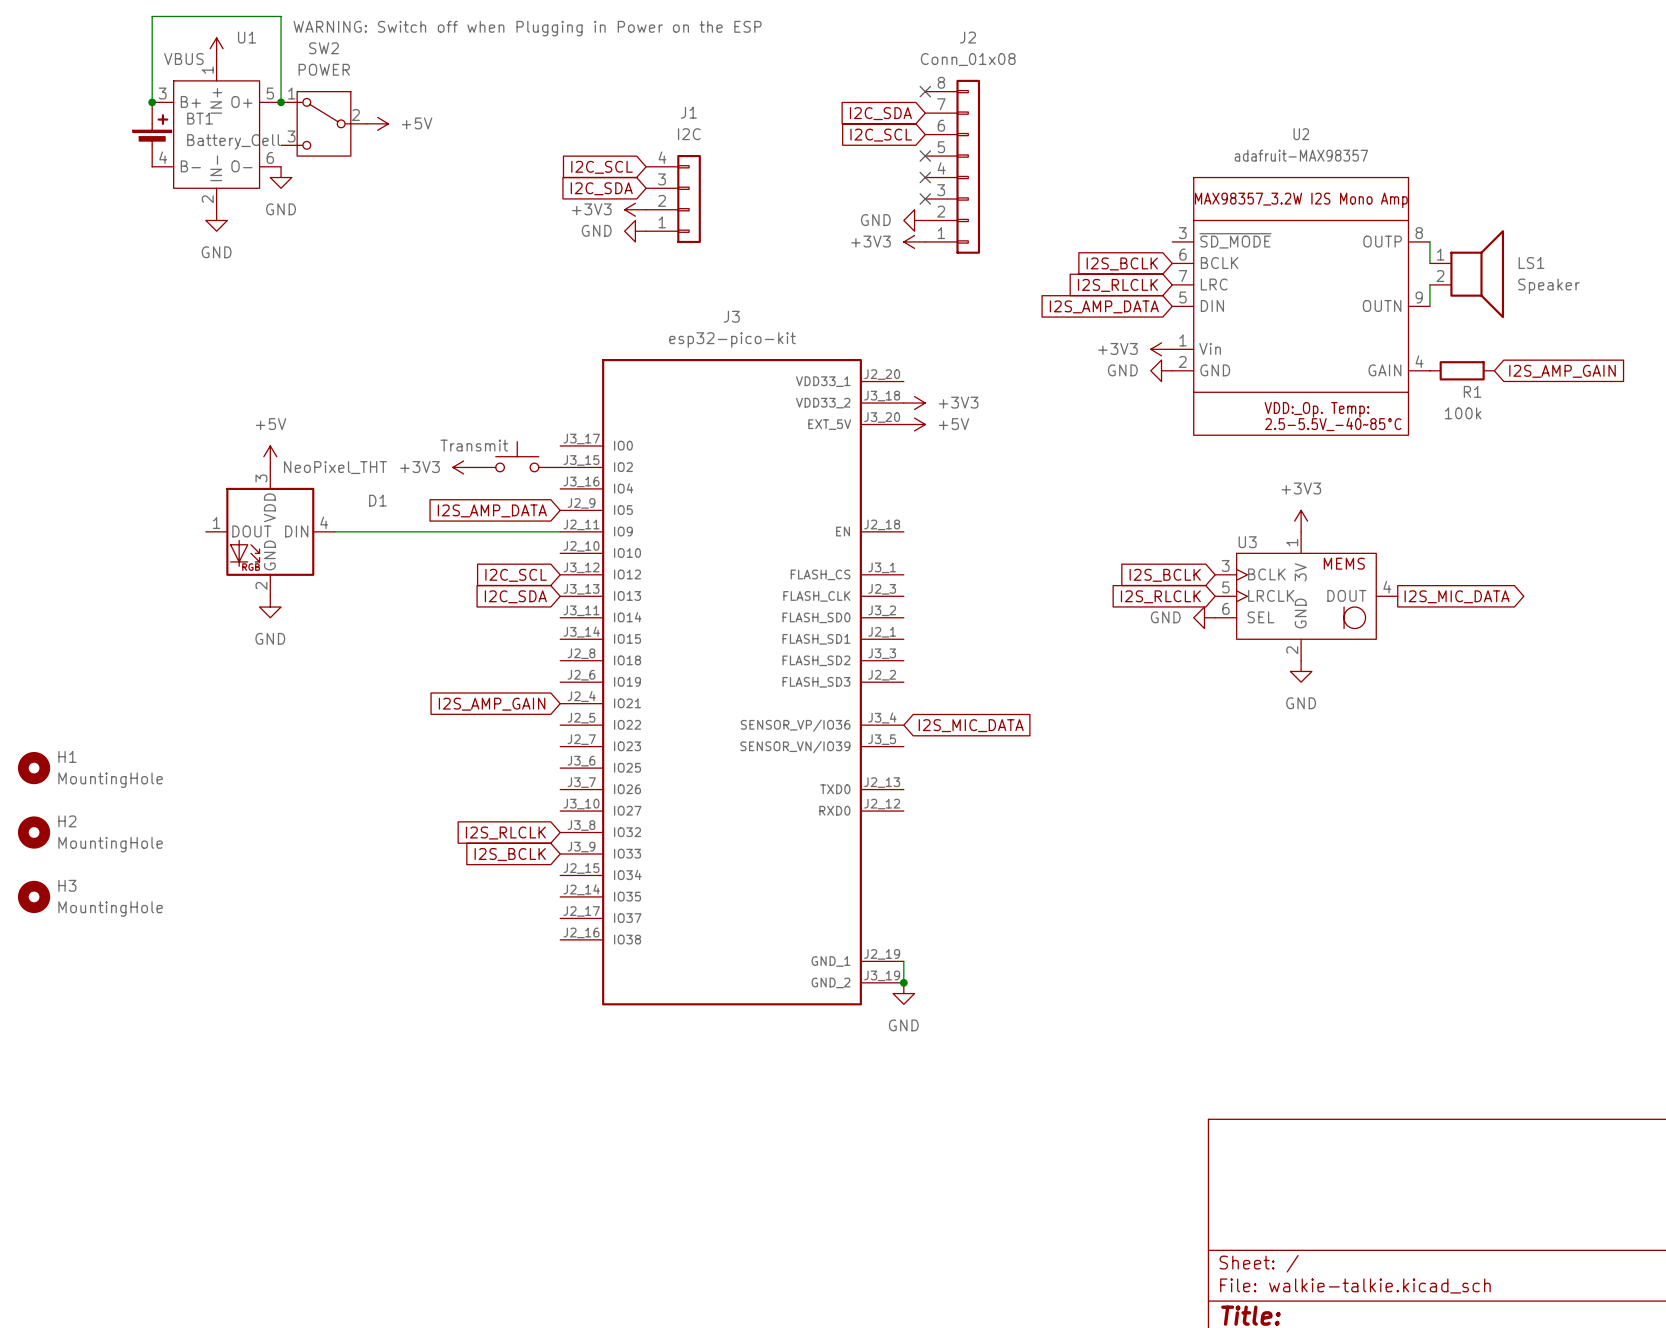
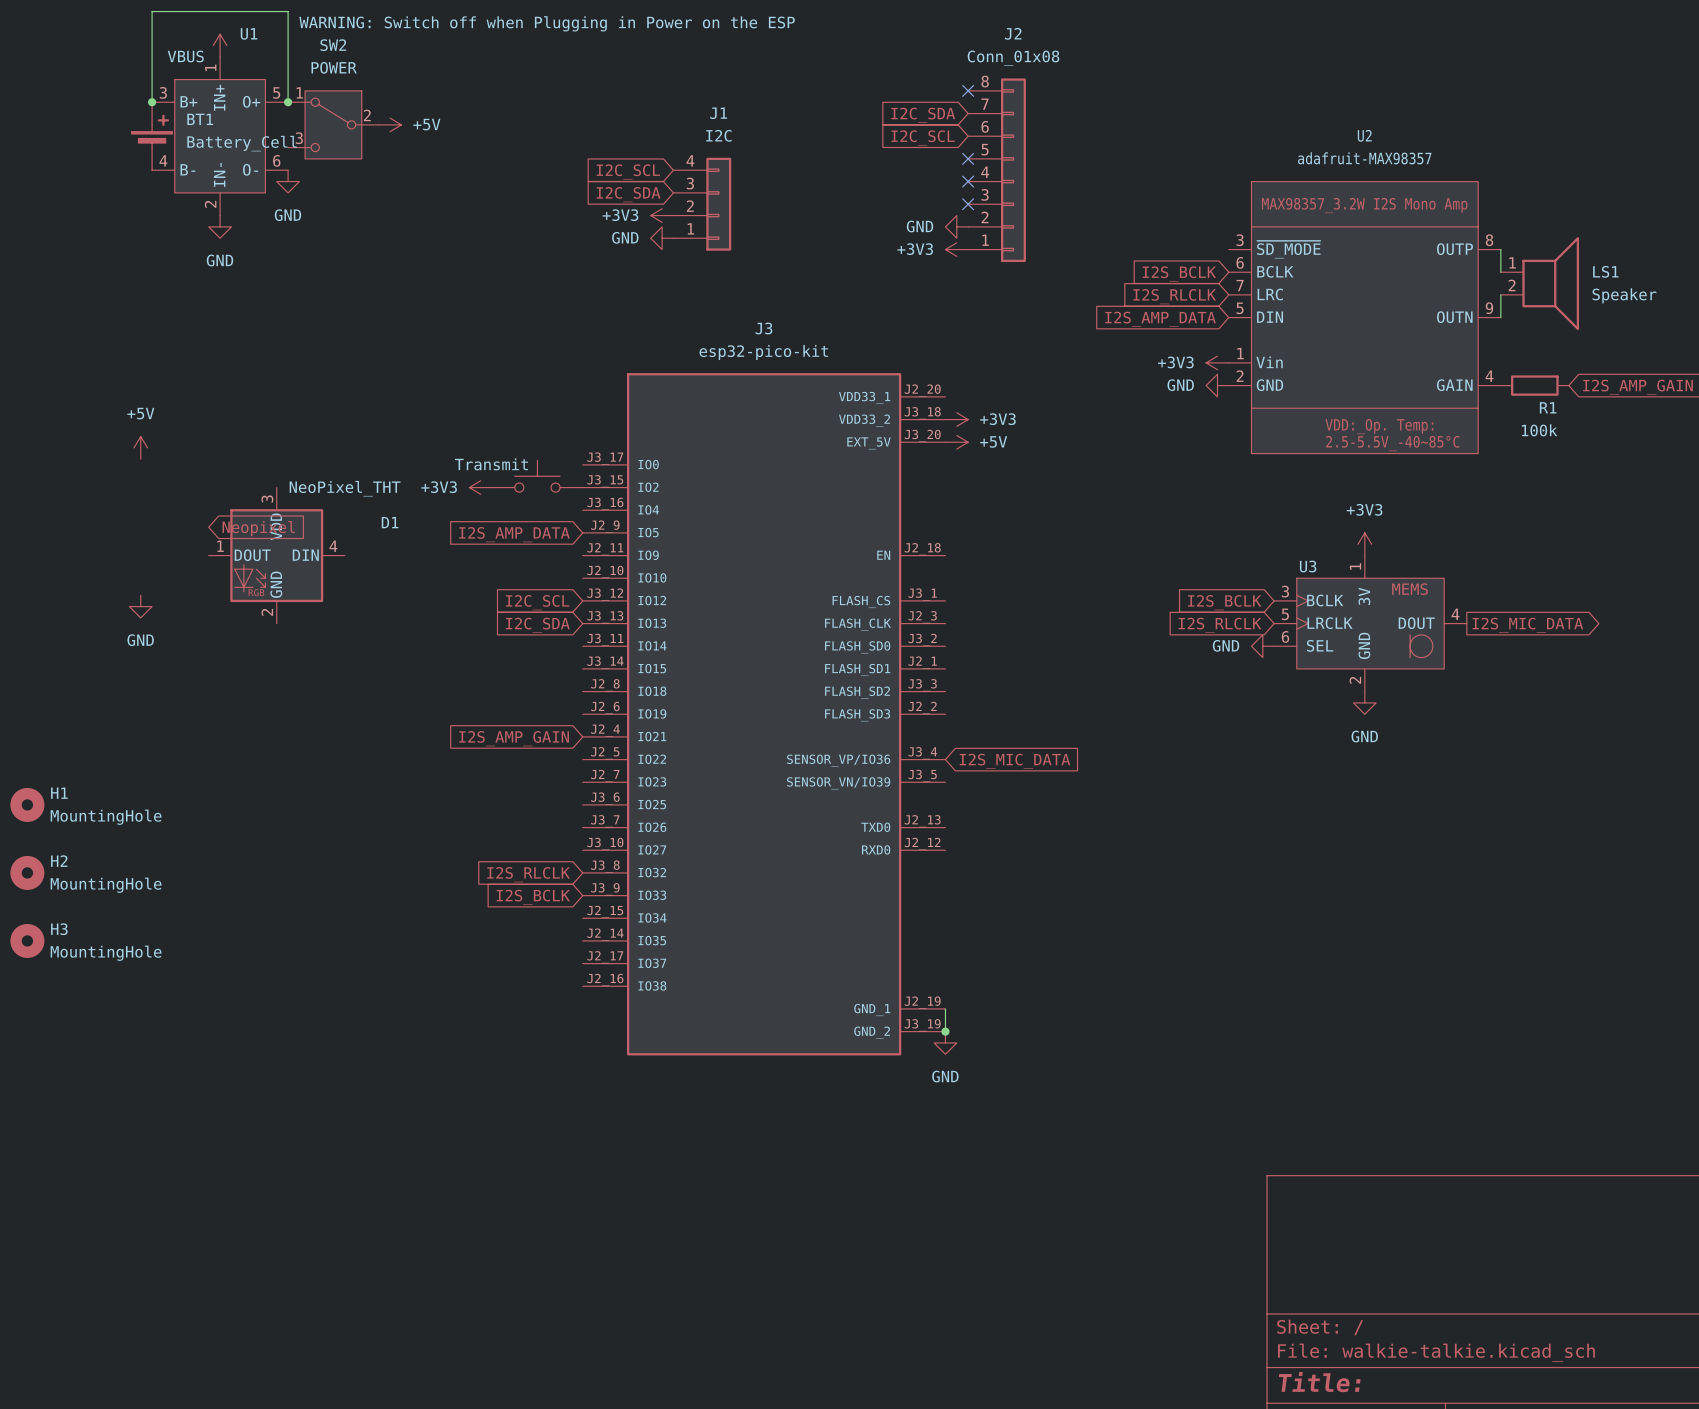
power symbol position: +5V (270, 456) -> +5V (140, 447)
global label: none -> Neopixel (258, 528)
wire: (334, 531) (560, 531) -> none
power symbol position: GND (270, 607) -> GND (140, 606)

